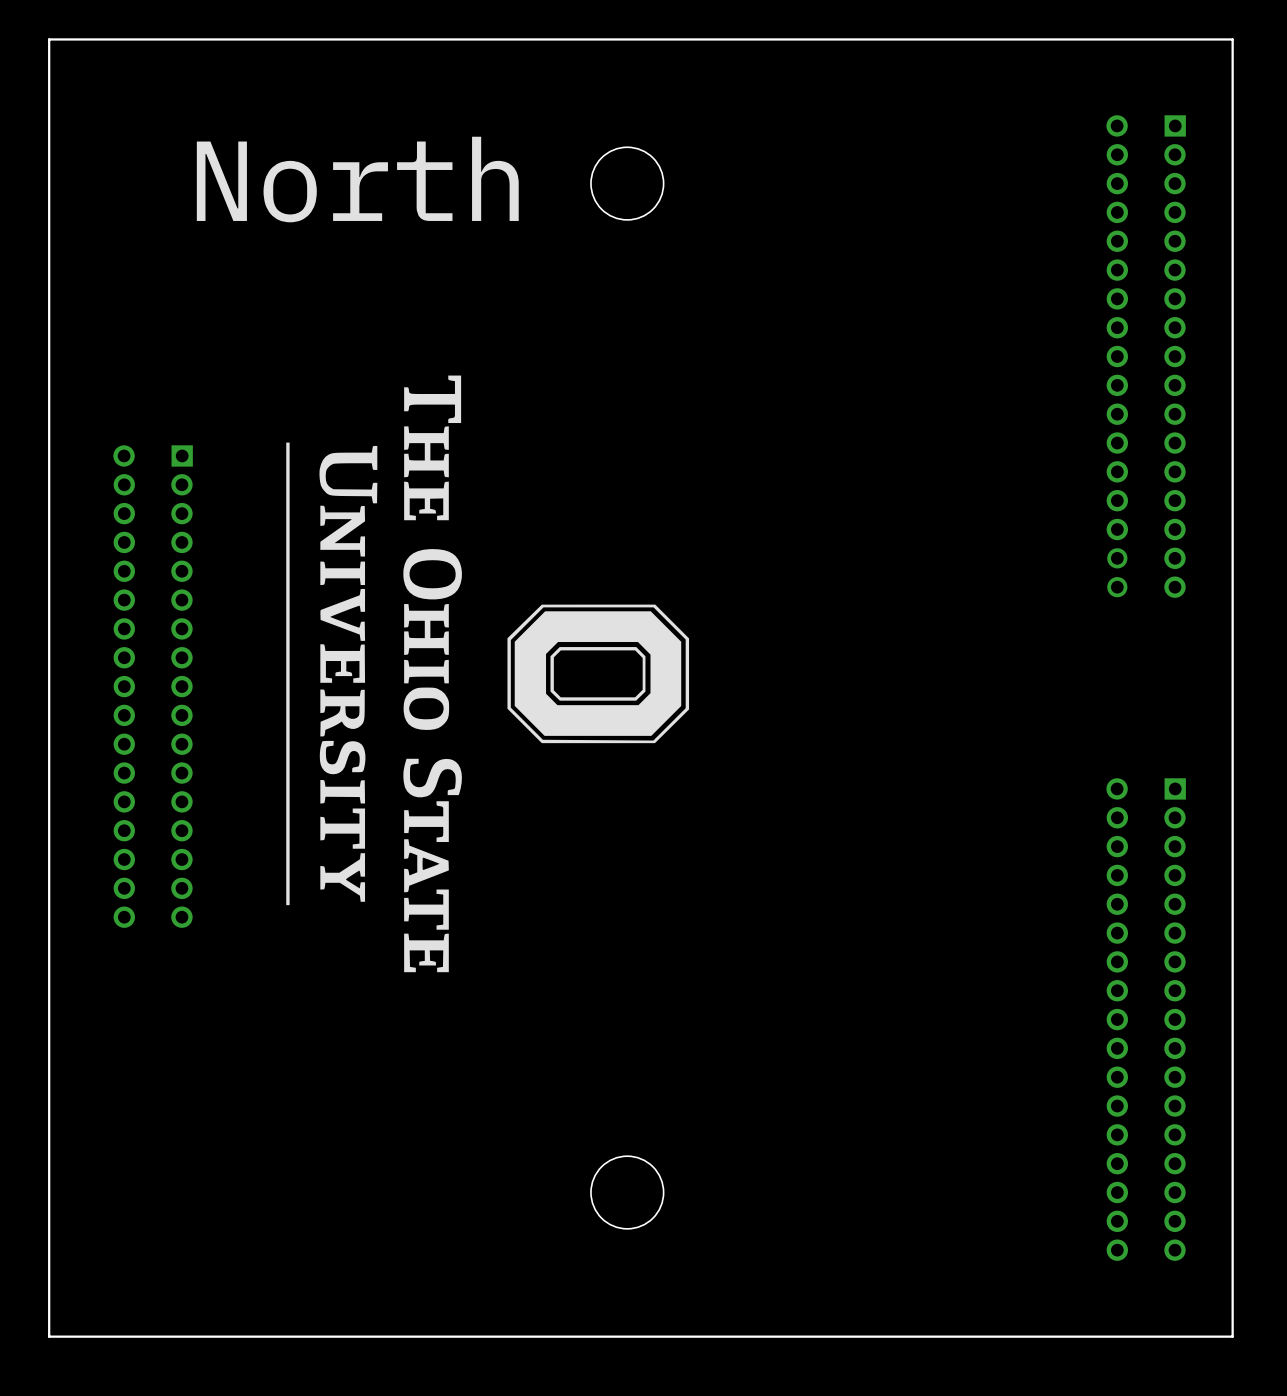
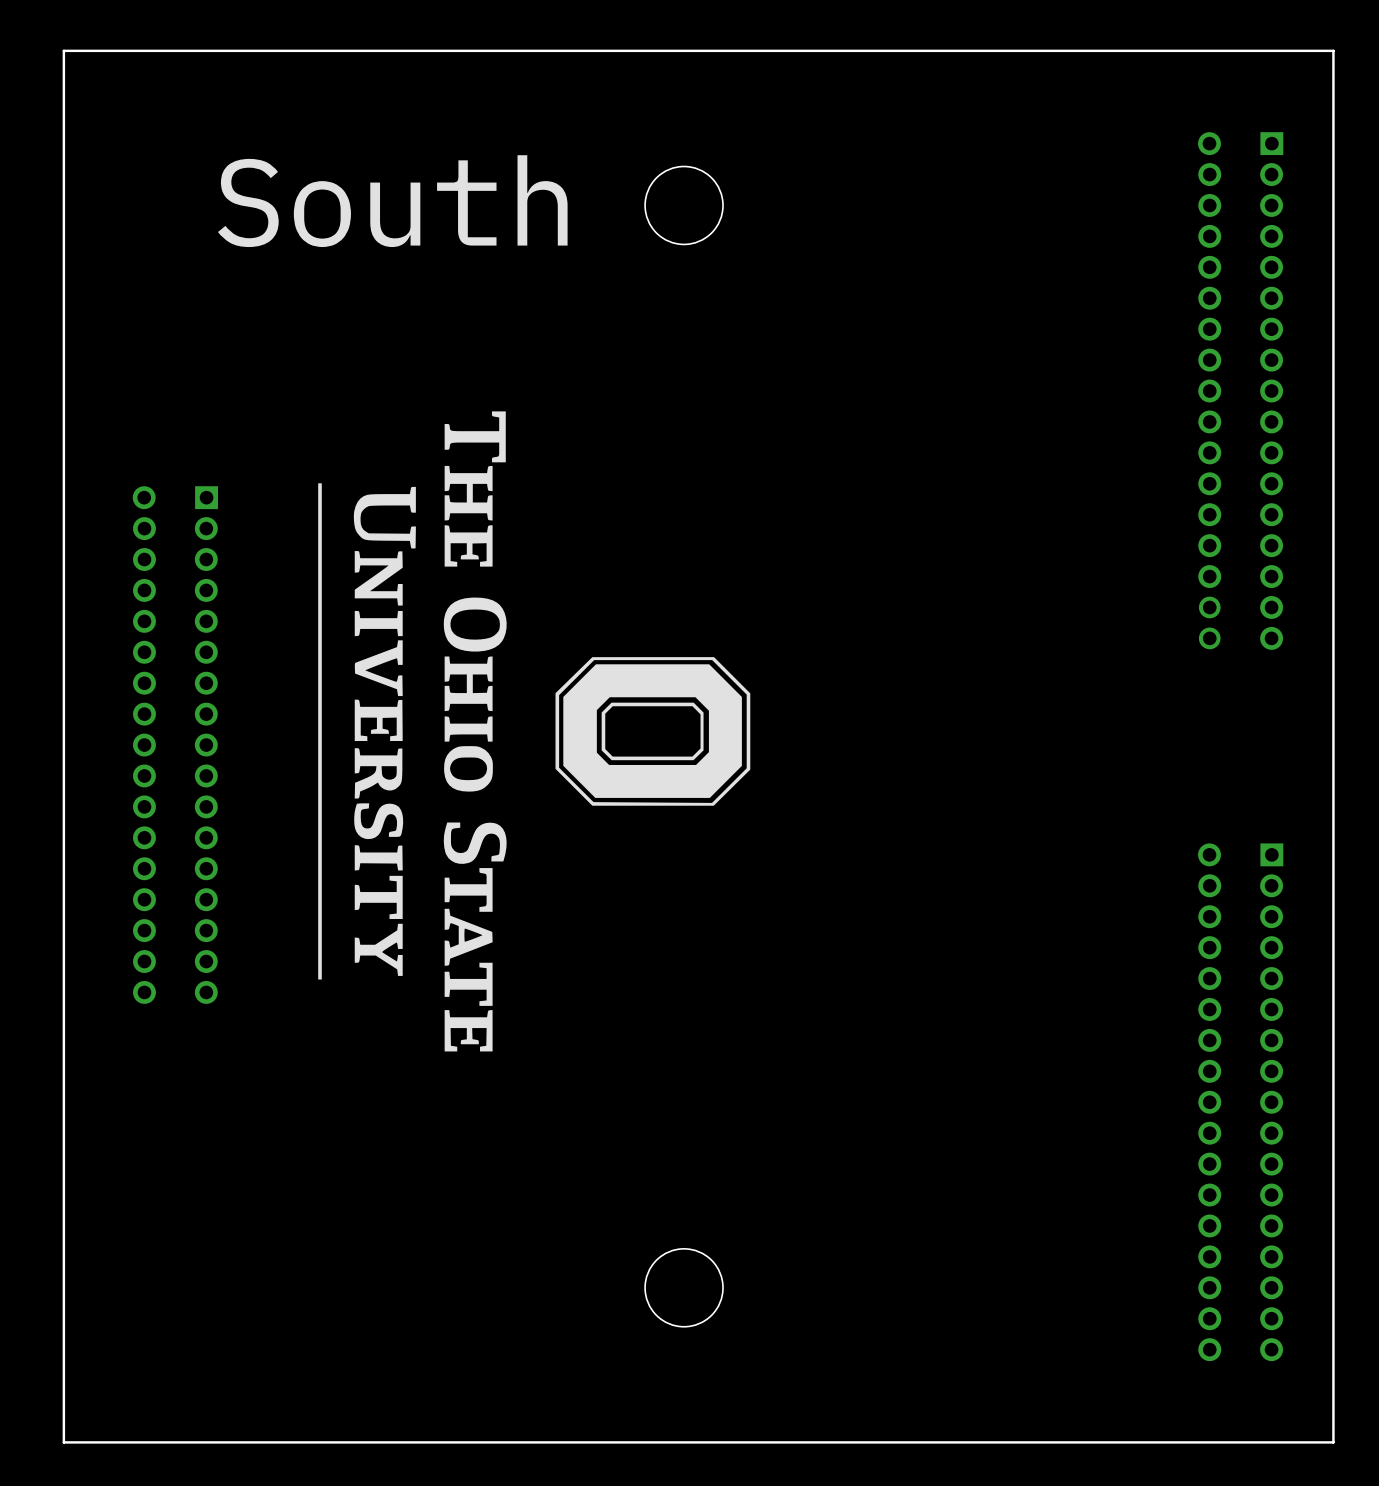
text: North (357, 179) -> South (392, 201)

